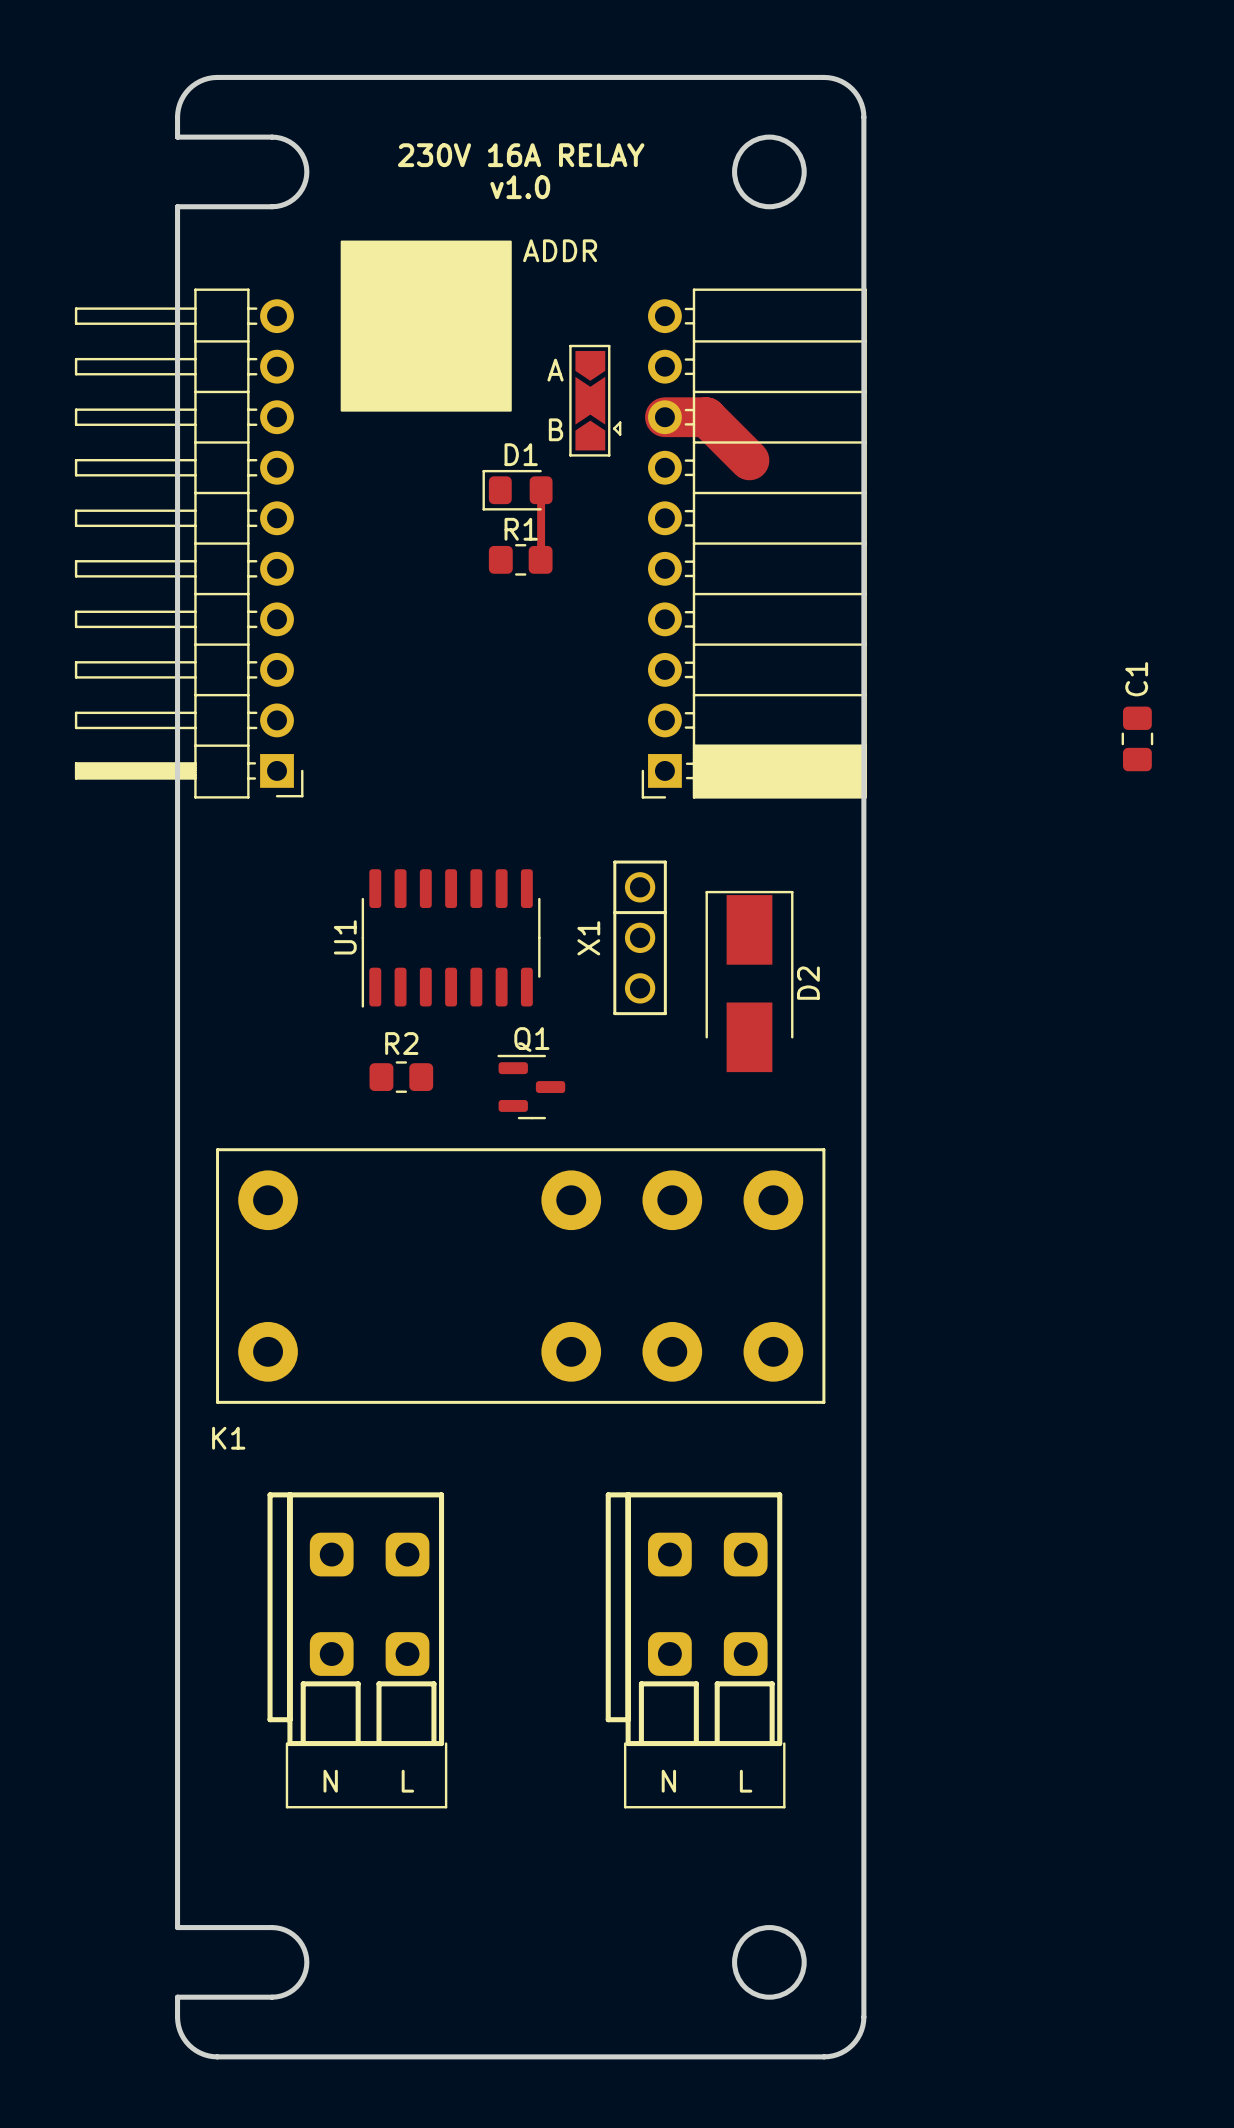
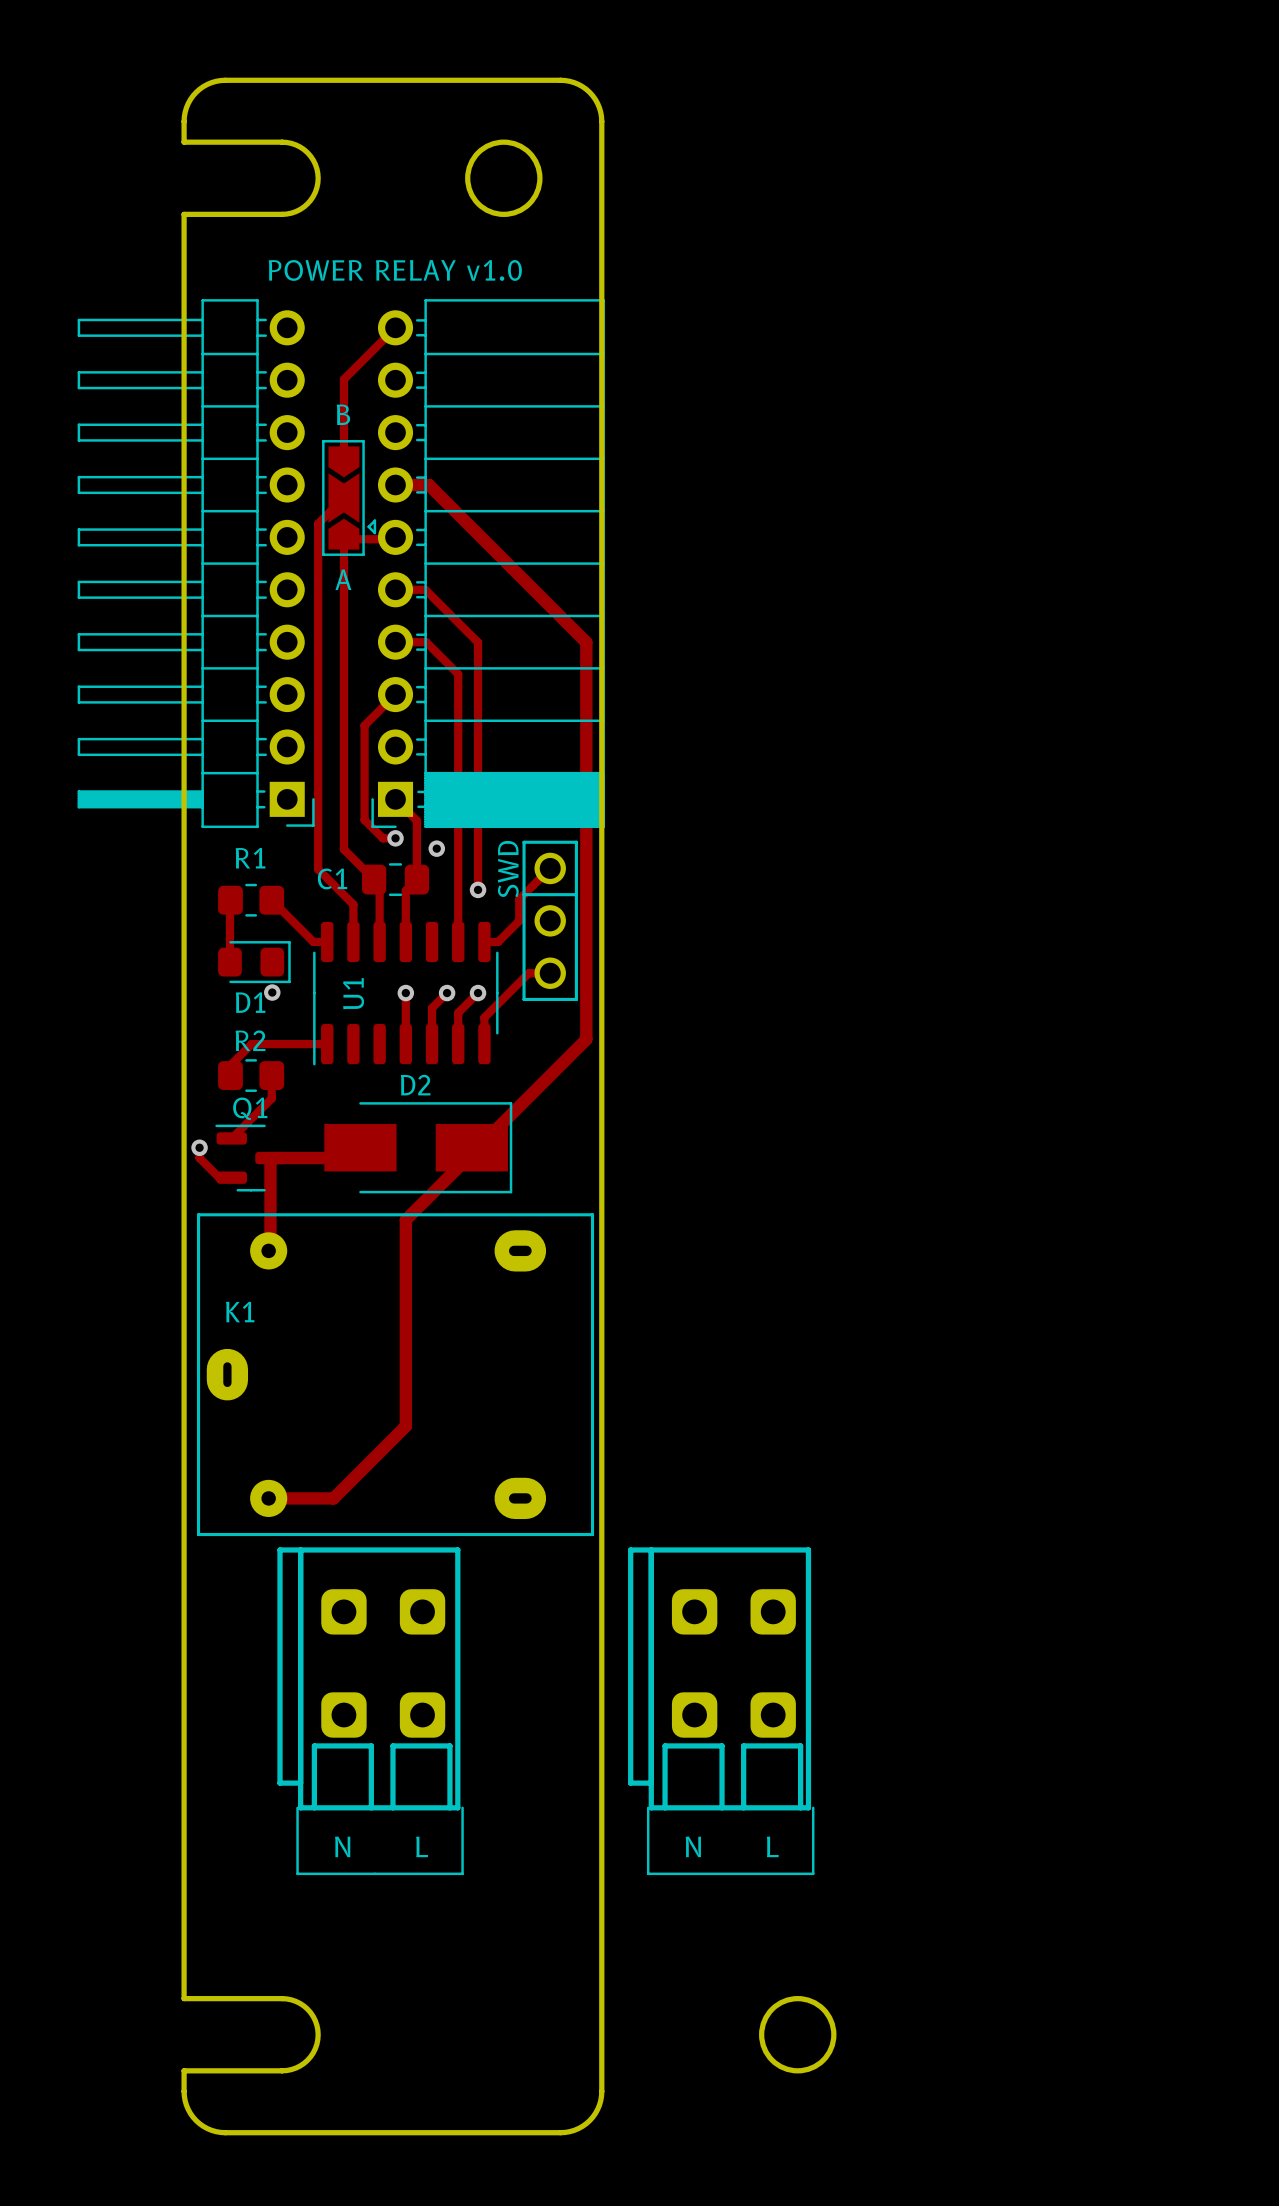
board edge: (540, 77) (828, 77) (841, 81) (852, 89) (859, 99) (863, 117) (863, 2021) (859, 2034) (852, 2045) (841, 2052) (828, 2056) (540, 2056) -> (560, 80) (578, 84) (589, 92) (599, 107) (601, 121) (601, 2091) (599, 2105) (589, 2120) (578, 2128) (560, 2132)
text: 230V 16A RELAY (521, 155) -> none
round board edge position: (769, 171) -> (503, 178)
text: v1.0 (520, 187) -> none
drawing: [340, 240, 512, 412] -> none
text: ADDR (560, 250) -> none
text: none -> POWER RELAY v1.0 (395, 270)
track: none -> (395, 327) (343, 379) (343, 456)
text position: A (555, 370) -> A (343, 579)
part position: (595, 400) -> (349, 497)
track: (664, 417) (706, 417) (749, 460) -> none
text position: B (556, 429) -> B (343, 414)
track: none -> (395, 484) (428, 484) (586, 642) (586, 1039) (478, 1147) (471, 1147) (471, 1153) (405, 1219) (405, 1426) (333, 1498) (268, 1498)
track: none -> (343, 497) (318, 523) (318, 869) (353, 904) (353, 941)
D1 rotation: 0° (517, 490) -> 180° (254, 962)
D1 position: (517, 490) -> (254, 962)
track: (541, 490) (541, 559) -> none
track: none -> (395, 537) (393, 539) (343, 539) (343, 849) (379, 885) (379, 941)
R1 name position: R1 (521, 529) -> R1 (250, 858)
part position: (754, 543) -> (488, 563)
R1 position: (520, 559) -> (251, 900)
track: none -> (395, 589) (425, 589) (478, 642) (478, 889)
track: none -> (395, 642) (426, 642) (458, 674) (458, 941)
track: none -> (395, 694) (364, 725) (364, 819) (382, 838) (395, 838)
C1 name position: C1 (1136, 679) -> C1 (332, 878)
C1 rotation: 0° (1137, 738) -> 90° clockwise (395, 879)
C1 position: (1137, 738) -> (395, 879)
track: none -> (395, 799) (416, 820) (416, 879) (405, 890) (405, 941)
via: none -> (395, 838)
via: none -> (436, 848)
track: none -> (550, 868) (519, 899) (519, 920) (498, 941) (484, 941)
text: none -> SWD (508, 869)
via: none -> (478, 889)
track: none -> (230, 900) (229, 962)
track: none -> (271, 900) (313, 941) (327, 941)
part: none -> (550, 920)
U1 name position: U1 (345, 937) -> U1 (353, 993)
X1: (640, 937) -> none
U1 position: (451, 938) -> (405, 993)
track: none -> (550, 973) (528, 973) (484, 1017) (484, 1044)
via: none -> (272, 992)
track: none -> (405, 993) (405, 1044)
via: none -> (405, 993)
track: none -> (447, 993) (432, 1008) (432, 1044)
via: none -> (447, 993)
track: none -> (478, 993) (458, 1012) (458, 1044)
via: none -> (478, 993)
D2 rotation: 0° (749, 981) -> 90° clockwise (418, 1147)
D2 position: (749, 981) -> (418, 1147)
D2 name position: D2 (808, 983) -> D2 (415, 1085)
track: none -> (327, 1044) (251, 1044) (230, 1065) (230, 1075)
track: none -> (271, 1075) (271, 1098) (231, 1138)
R2 position: (401, 1077) -> (251, 1075)
Q1 position: (531, 1087) -> (250, 1158)
track: none -> (199, 1147) (199, 1158) (219, 1177) (231, 1177)
via: none -> (199, 1147)
track: none -> (360, 1147) (350, 1158) (270, 1158) (270, 1249) (268, 1250)
K1 footprint: [216, 1148, 826, 1404] -> [196, 1213, 595, 1537]
K1 name position: K1 (228, 1438) -> K1 (240, 1312)

